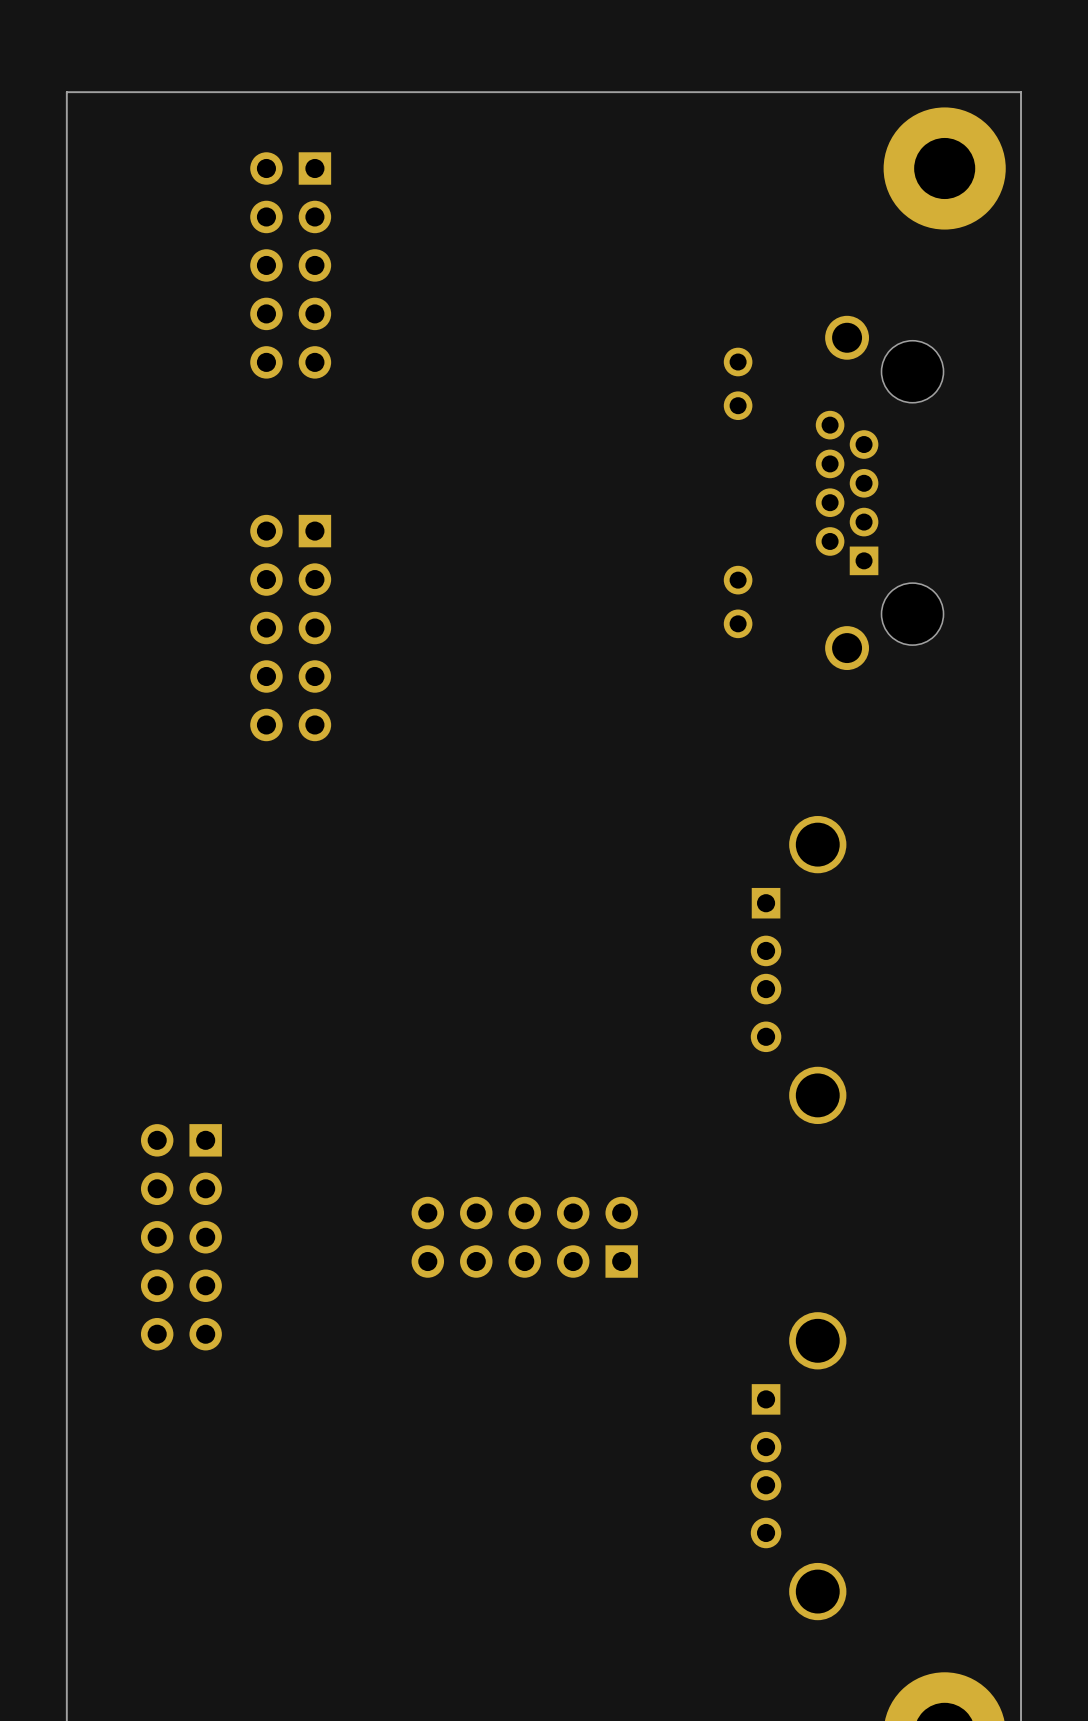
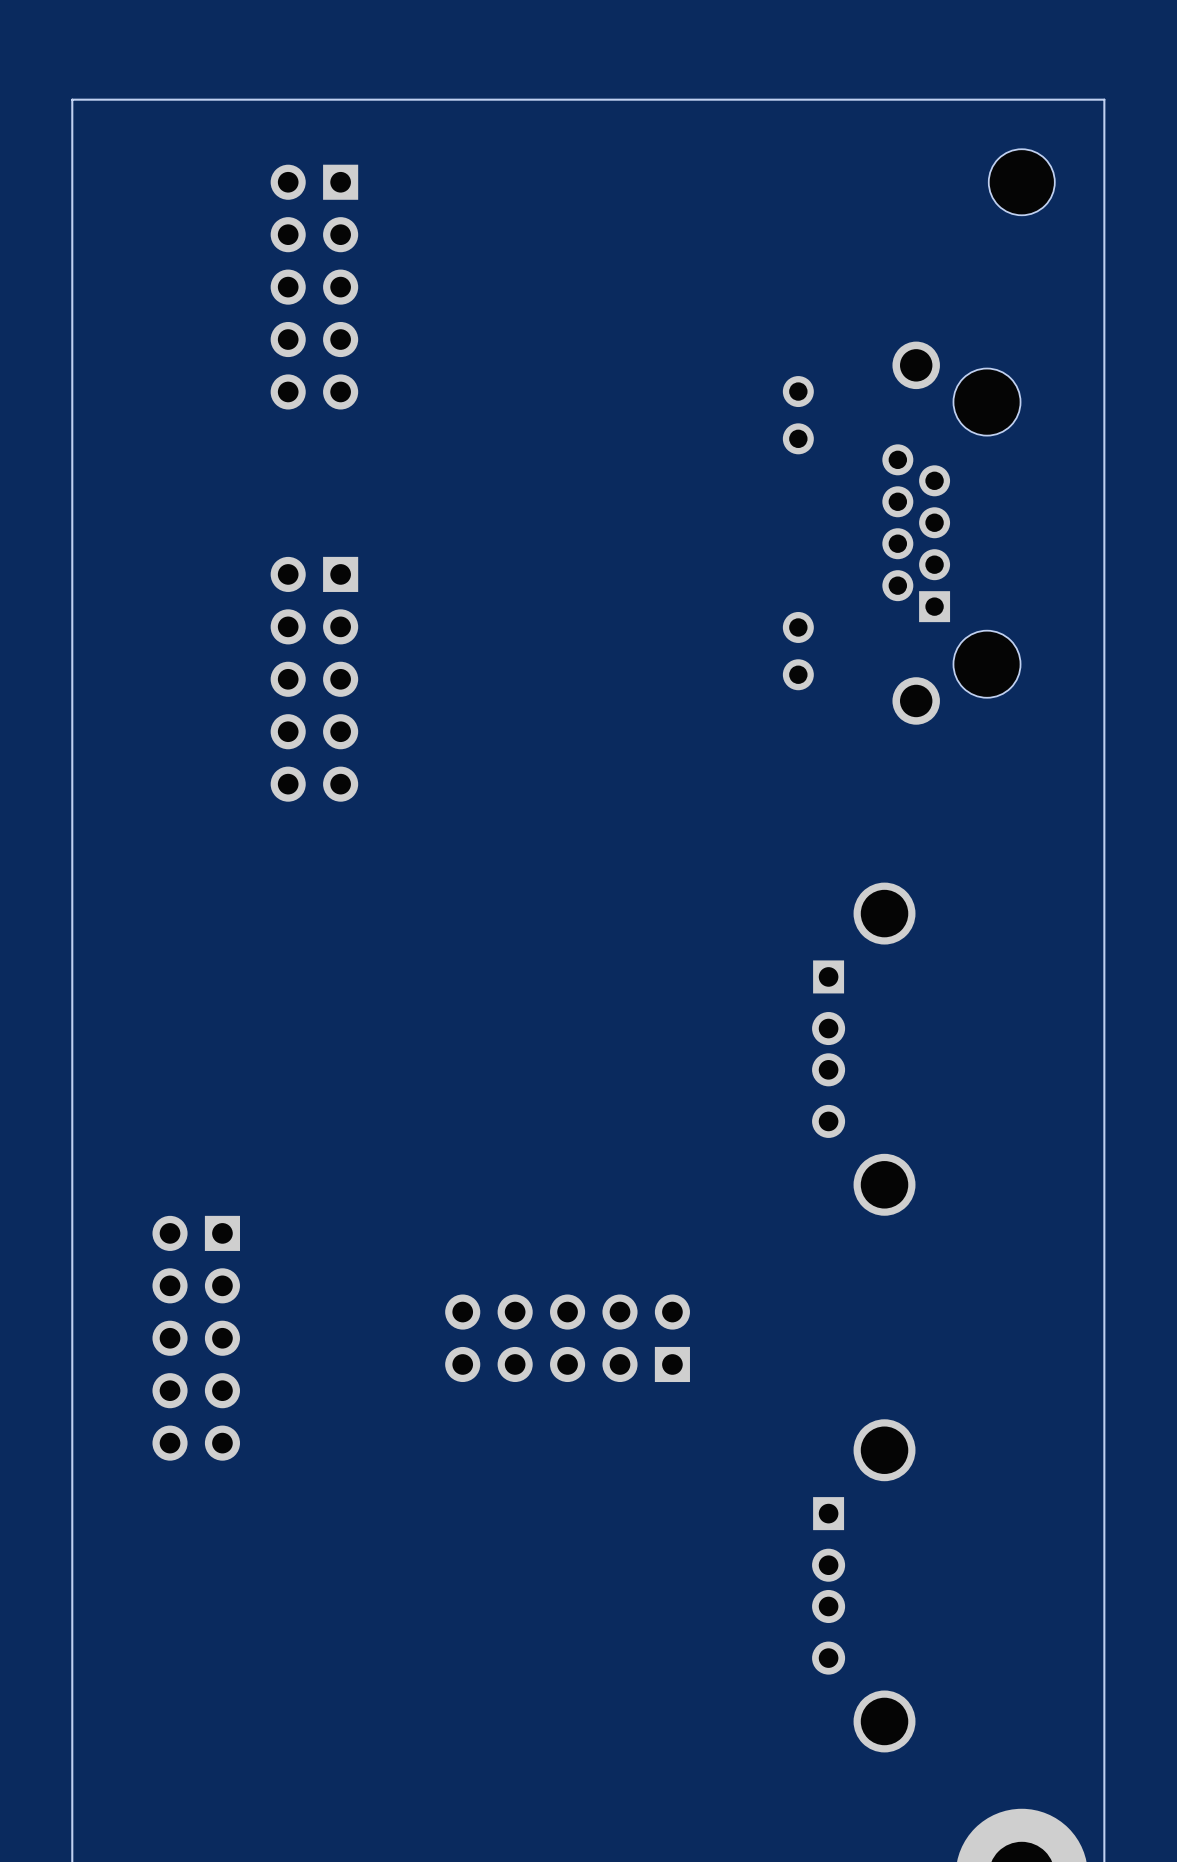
part footprint: [883, 107, 1006, 230] -> [988, 149, 1055, 216]

